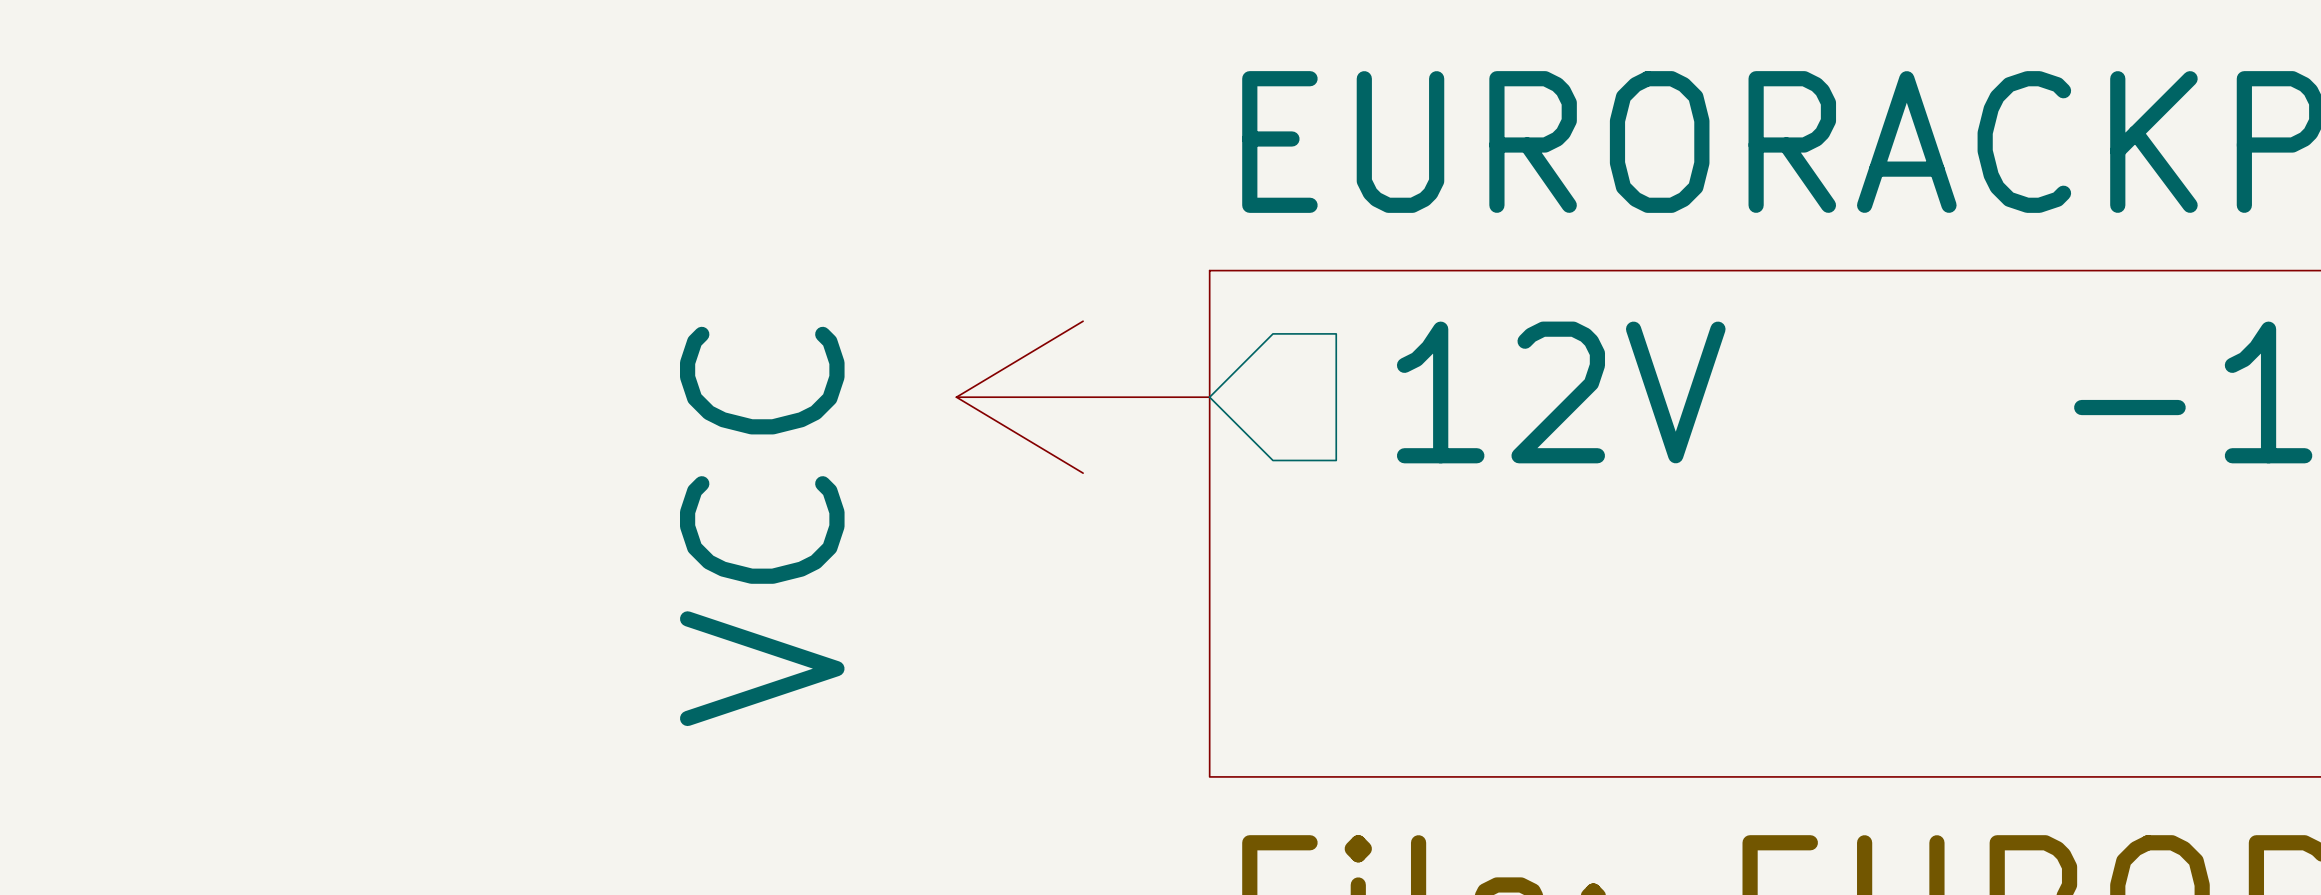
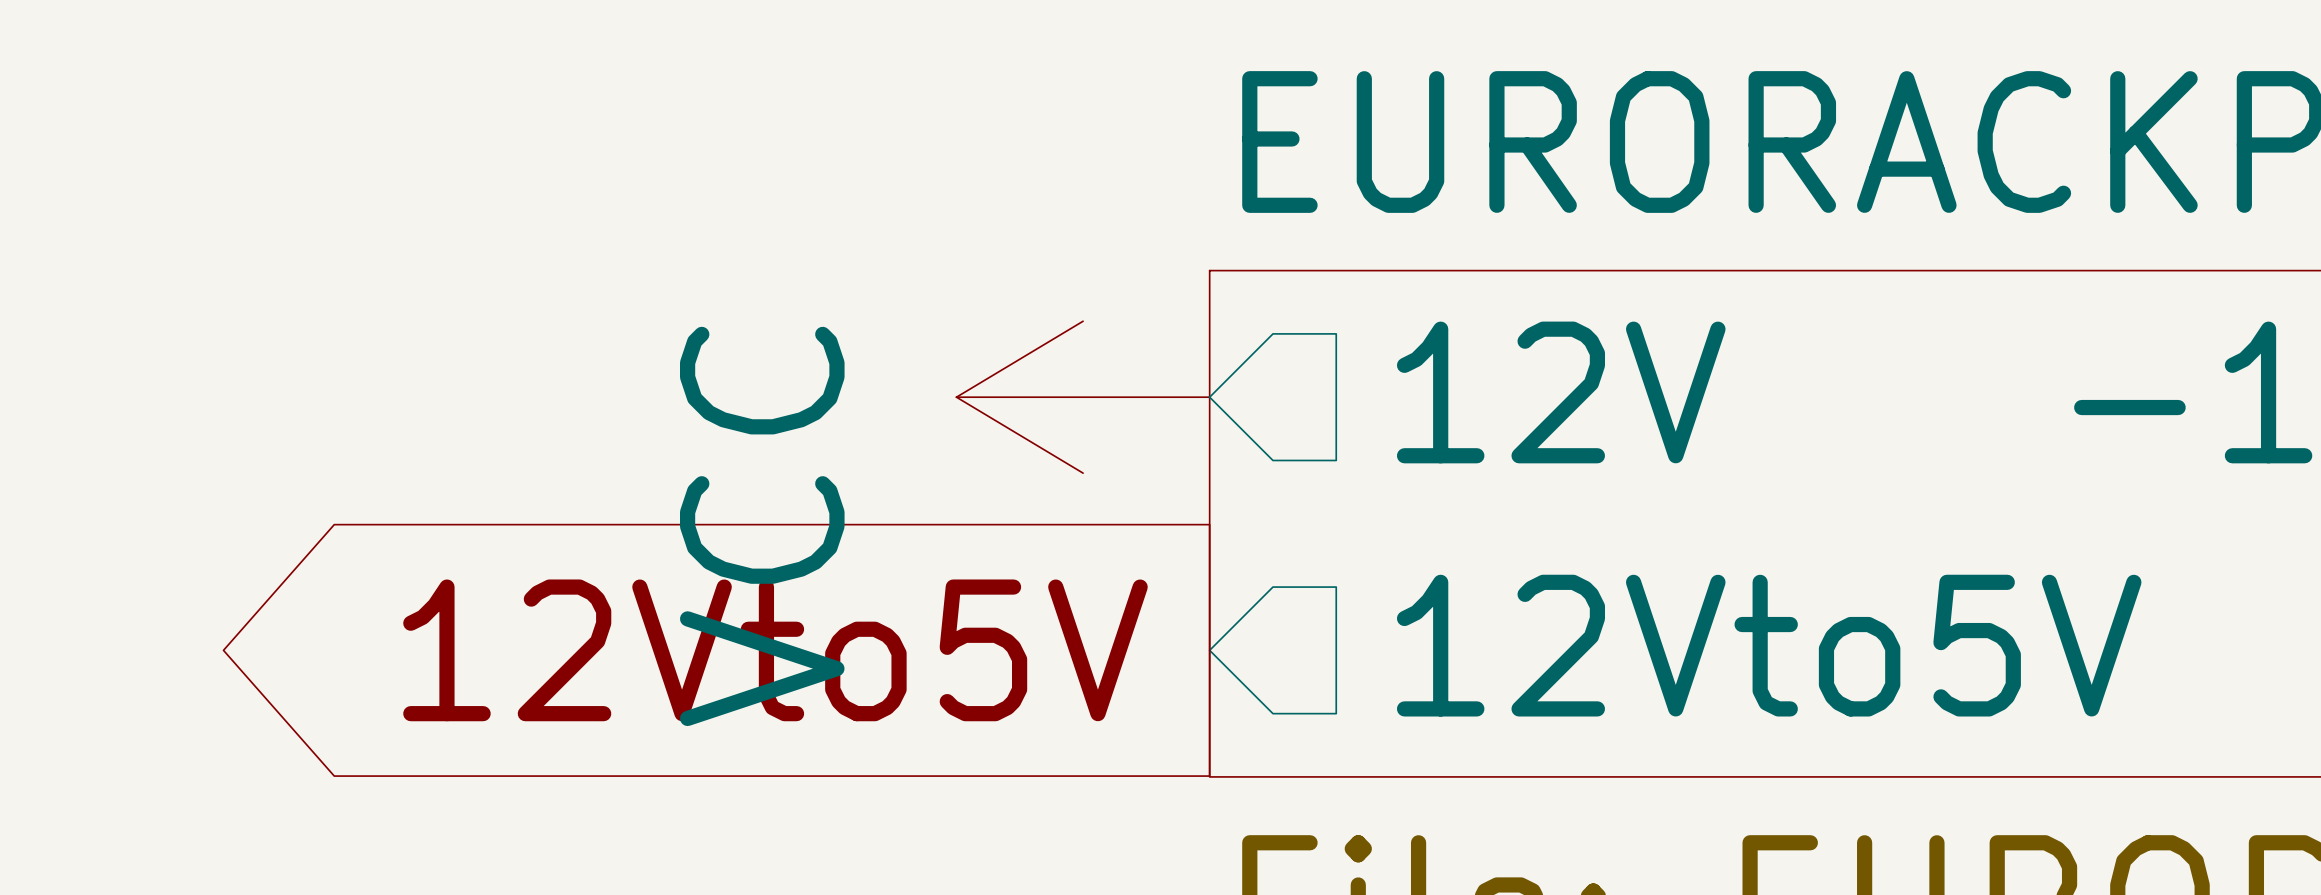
sheet pin: none -> 12Vto5V (1769, 645)
global label: none -> 12Vto5V (775, 650)

